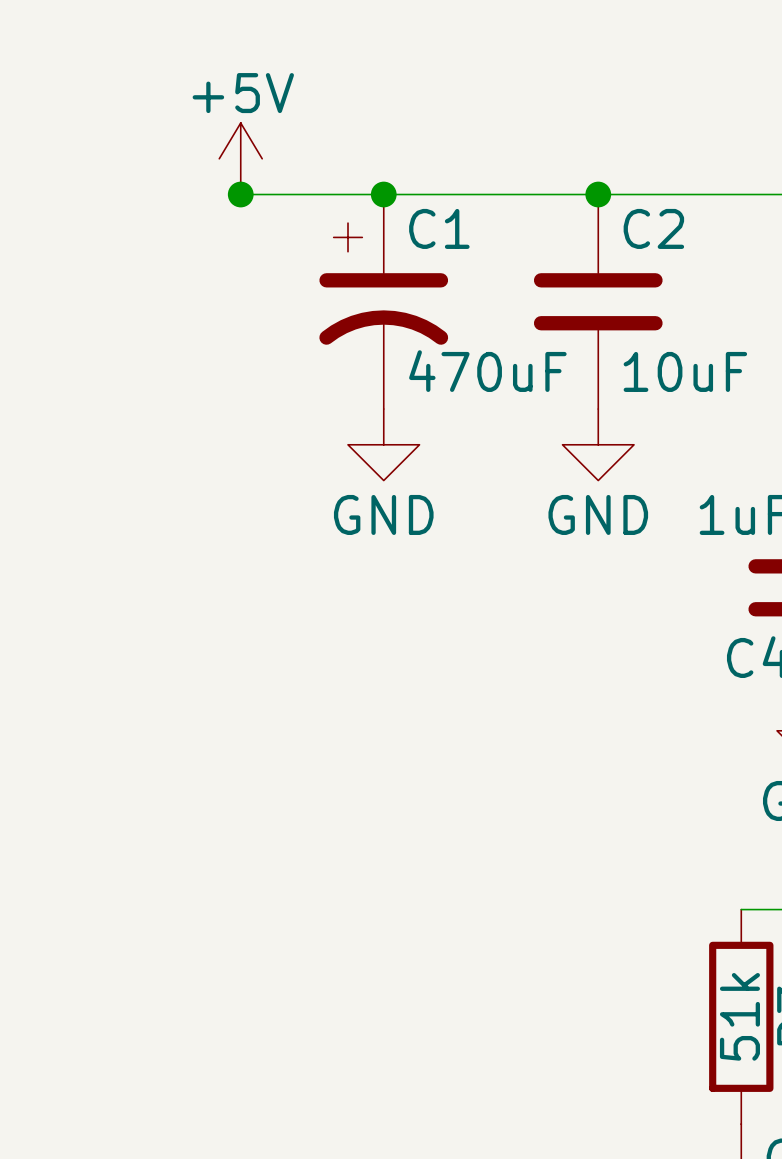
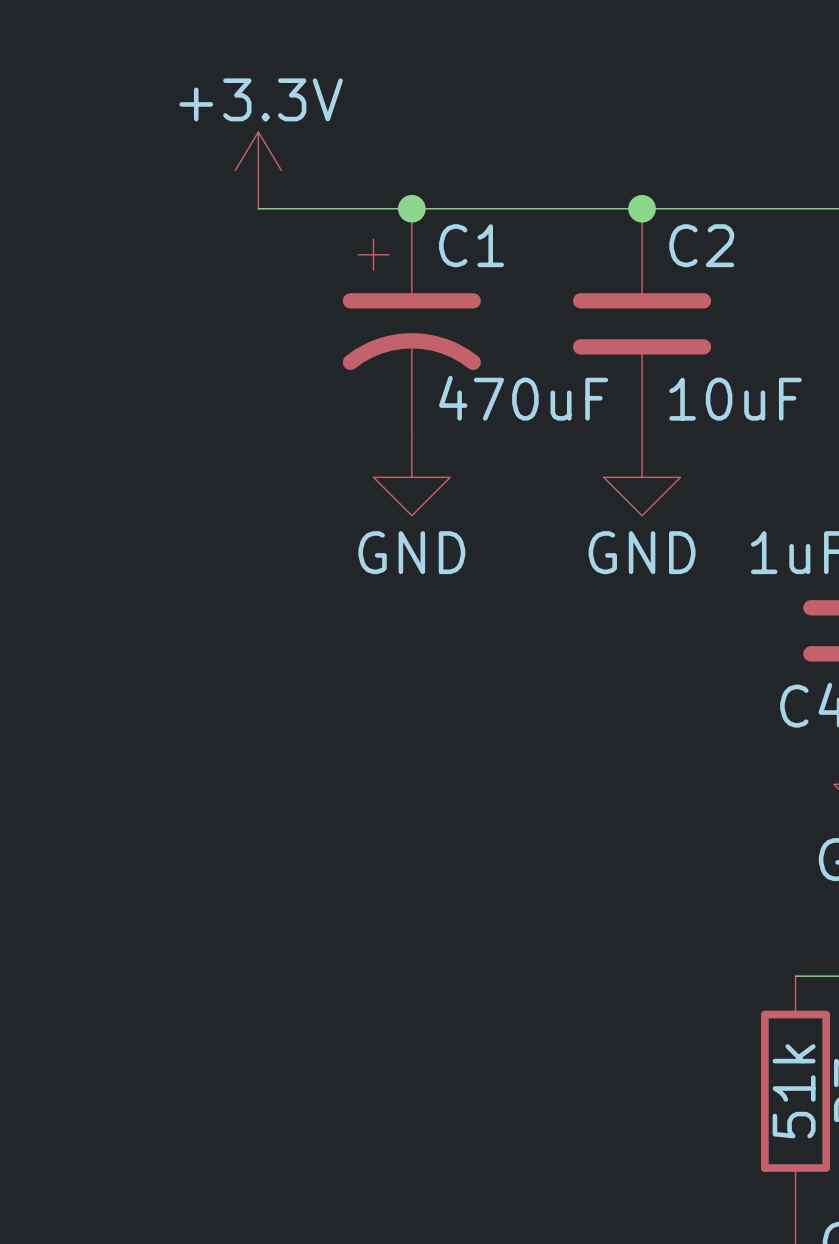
power symbol: +5V (240, 158) -> +3.3V (258, 170)
junction: (240, 194) -> none

